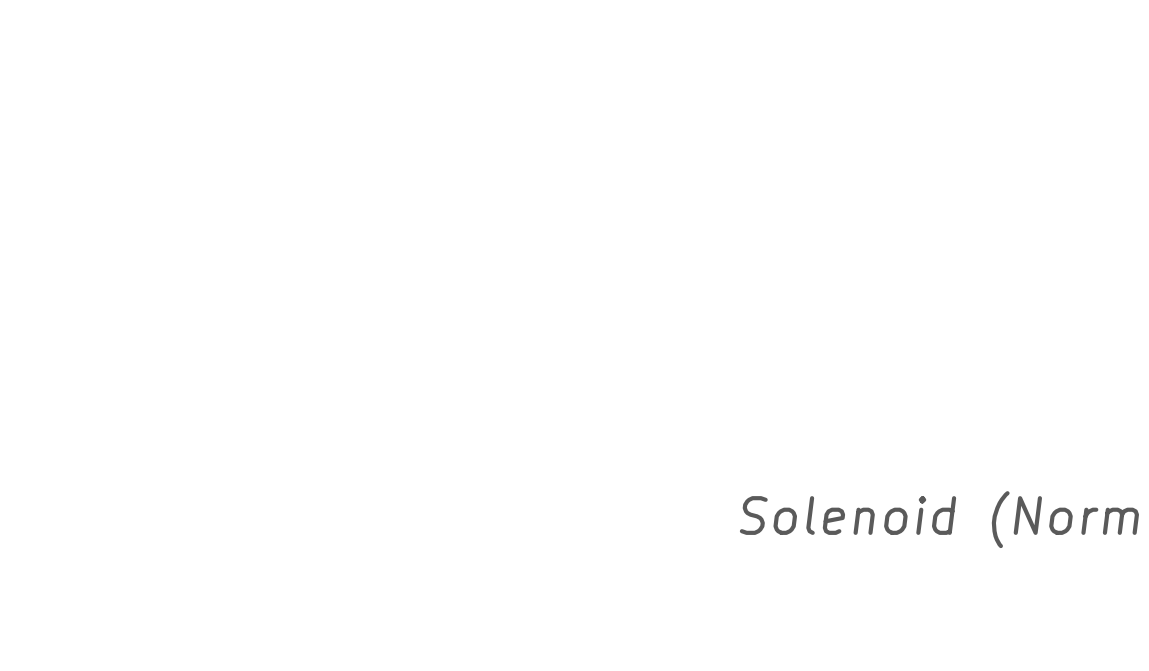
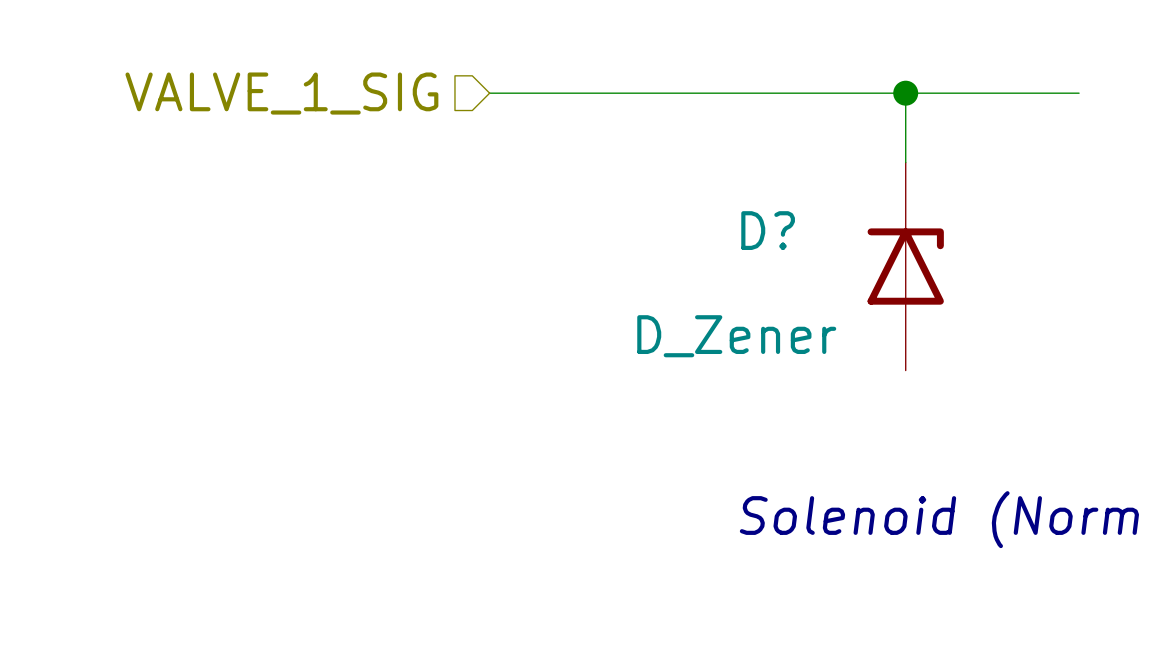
hierarchical label: none -> VALVE_1_SIG (281, 93)
wire: none -> (489, 93) (1079, 93)
wire: none -> (905, 93) (905, 162)
junction: none -> (905, 93)
D?: none -> D_Zener (905, 266)

